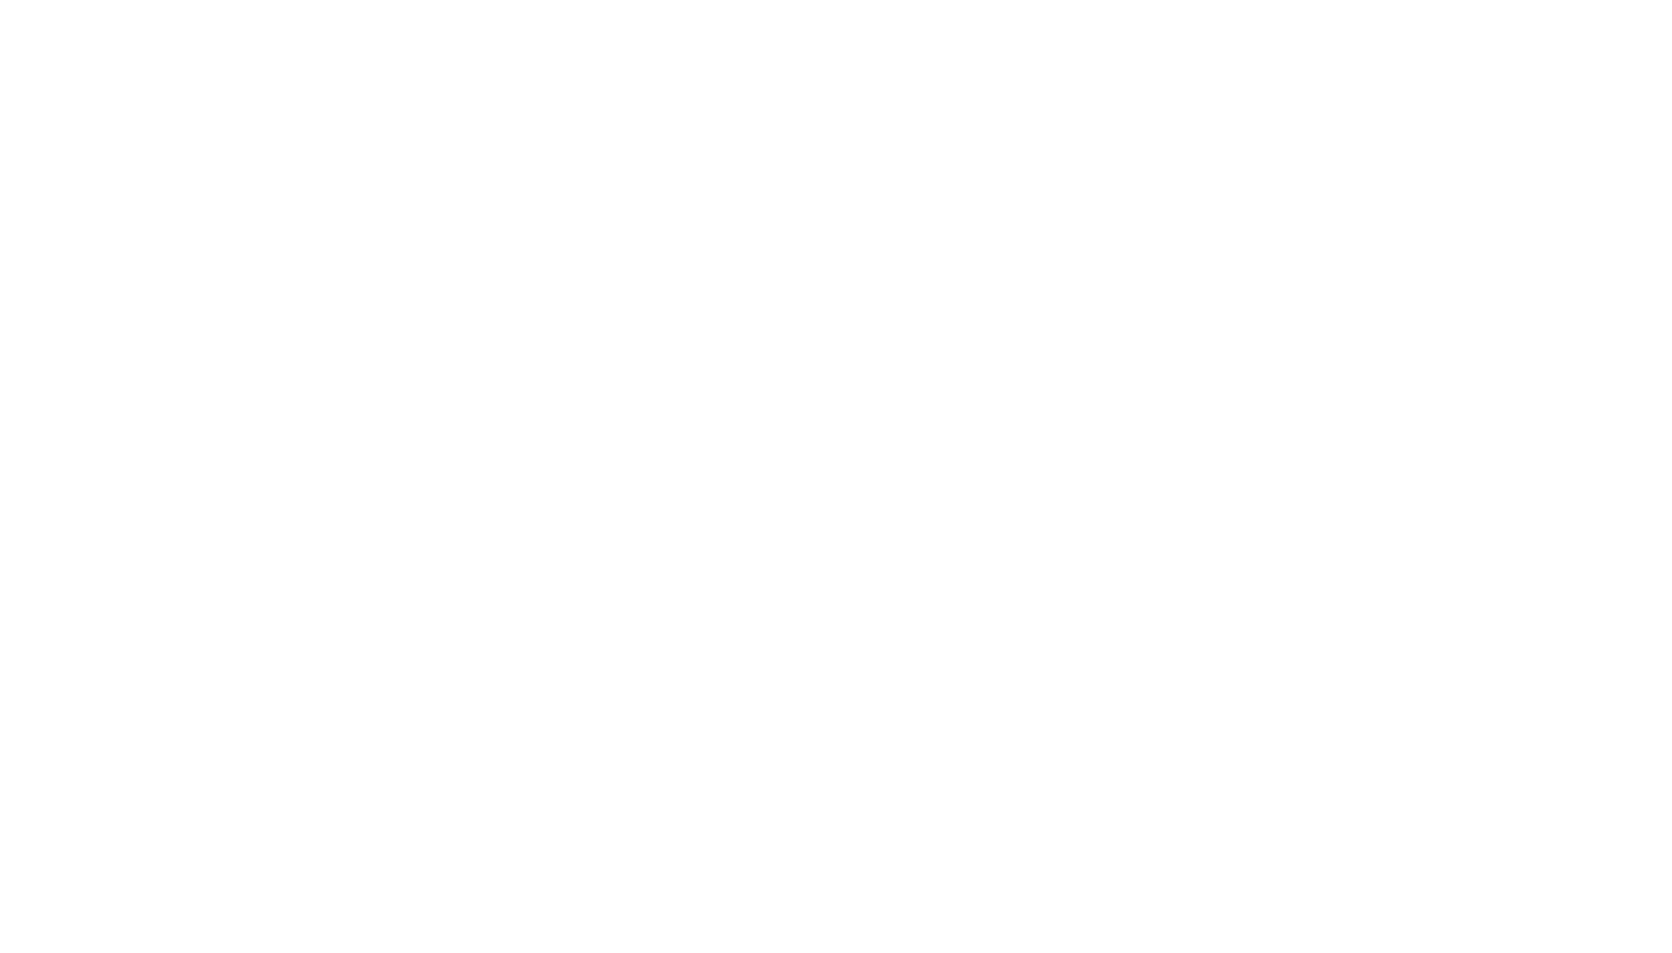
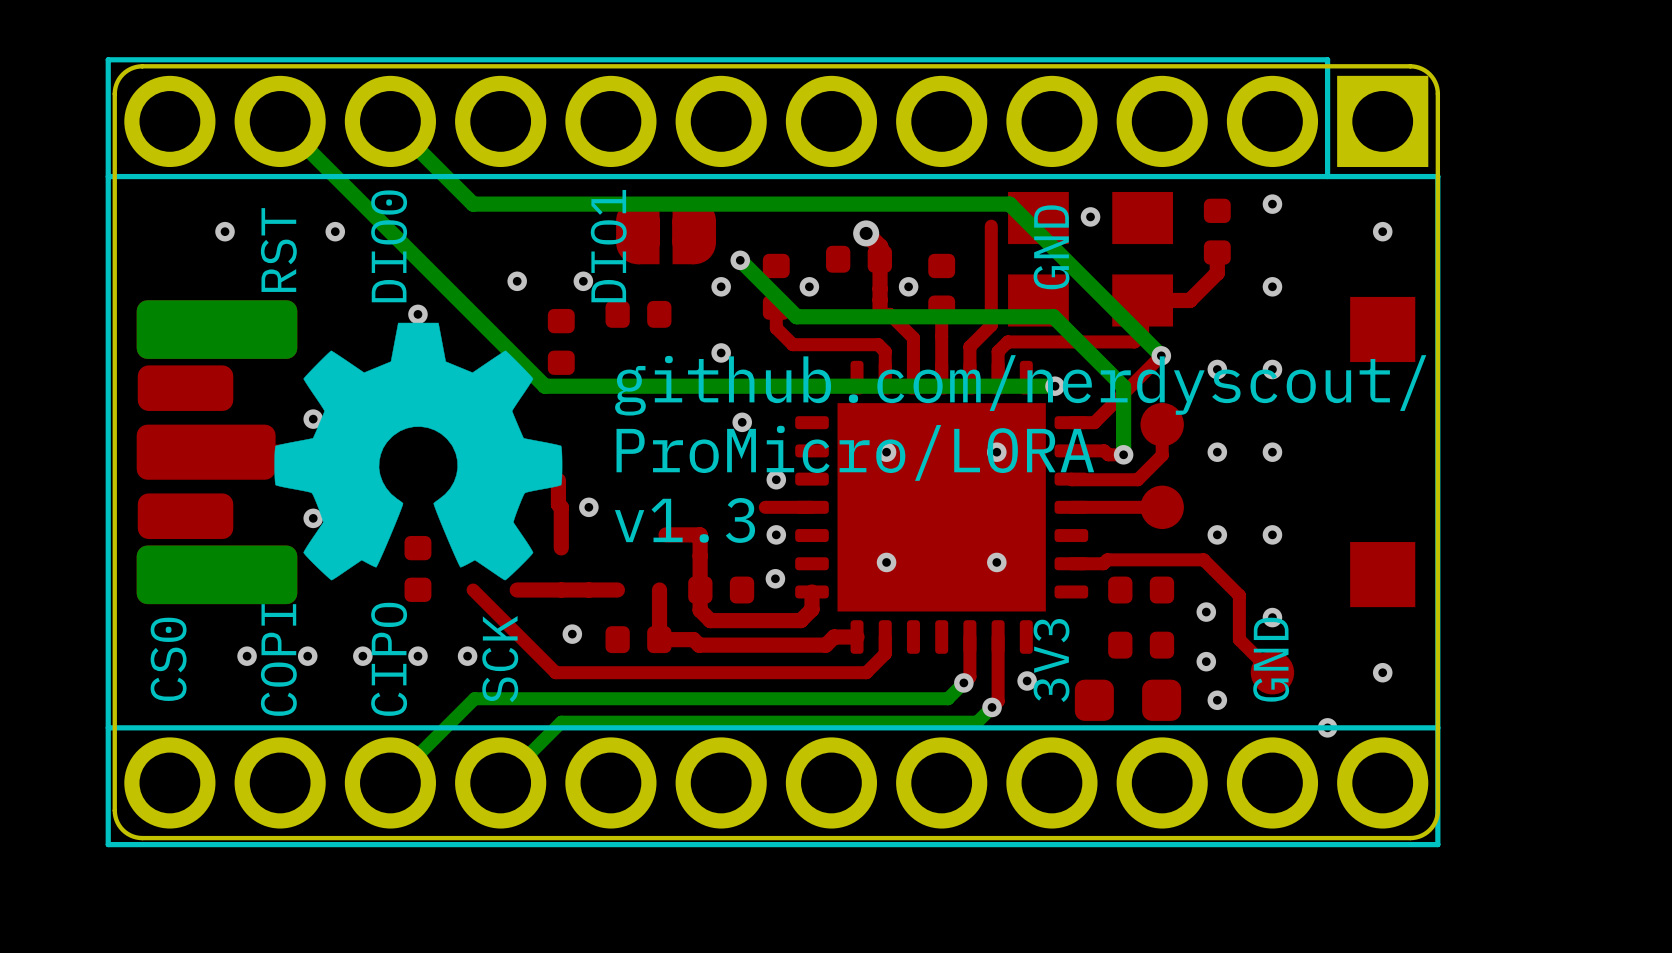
board edge: none -> (1410, 66) (142, 66) (127, 70) (118, 79) (114, 93) (114, 810) (118, 825) (130, 835) (142, 838) (1410, 838) (1424, 833) (1433, 825) (1437, 810) (1437, 93) (1436, 84) (1429, 74) (1419, 67) (1410, 66)
bottom track: none -> (280, 121) (544, 386) (1055, 386)
bottom track: none -> (390, 121) (473, 204) (1009, 204) (1161, 355)
via: none -> (1272, 204)
via: none -> (1090, 216)
top track: none -> (991, 226) (991, 325) (969, 346) (969, 377)
via: none -> (225, 231)
via: none -> (335, 231)
part: none -> (666, 231)
part: none -> (1217, 231)
via: none -> (1382, 231)
top track: none -> (866, 233) (879, 247) (880, 314) (889, 314) (913, 338) (913, 377)
via: none -> (866, 233)
text: none -> DIO0 (389, 246)
text: none -> DIO1 (608, 246)
text: none -> GND (1051, 247)
text: none -> RST (278, 250)
top track: none -> (1217, 252) (1217, 273) (1189, 300) (1142, 300) (1142, 333) (1134, 341) (1007, 341) (998, 351) (998, 377)
part: none -> (858, 259)
part: none -> (1090, 259)
bottom track: none -> (740, 260) (796, 316) (1053, 316) (1123, 386) (1123, 454)
via: none -> (740, 260)
via: none -> (517, 281)
via: none -> (583, 281)
via: none -> (721, 286)
part: none -> (776, 286)
via: none -> (809, 286)
via: none -> (908, 286)
part: none -> (941, 286)
via: none -> (1272, 286)
top track: none -> (776, 307) (776, 328) (792, 344) (878, 344) (885, 351) (885, 377)
top track: none -> (941, 307) (941, 377)
via: none -> (417, 314)
part: none -> (638, 314)
drawing: none -> [274, 322, 563, 581]
part: none -> (1382, 329)
part: none -> (561, 341)
via: none -> (721, 352)
top track: none -> (1161, 355) (1094, 422) (1071, 422)
via: none -> (1161, 355)
via: none -> (1217, 369)
via: none -> (1272, 369)
text: none -> github.com/nerdyscout/ (1020, 385)
via: none -> (1055, 386)
via: none -> (313, 419)
via: none -> (742, 422)
top track: none -> (1162, 424) (1162, 455) (1137, 479) (1071, 479)
part: none -> (1162, 424)
top track: none -> (1071, 450) (1104, 450) (1108, 454) (1123, 454)
part: none -> (206, 452)
part: none -> (216, 452)
part: none -> (773, 452)
via: none -> (886, 452)
via: none -> (996, 452)
via: none -> (1217, 452)
via: none -> (1272, 452)
text: none -> ProMicro/LORA (855, 452)
via: none -> (1123, 454)
via: none -> (776, 479)
top track: none -> (558, 480) (558, 504) (561, 507) (561, 547)
via: none -> (588, 507)
top track: none -> (812, 507) (765, 507)
part: none -> (941, 507)
top track: none -> (1162, 507) (1071, 507)
part: none -> (1162, 507)
via: none -> (313, 518)
text: none -> v1.3 (684, 520)
top track: none -> (666, 534) (700, 534) (700, 610) (710, 620) (800, 620) (812, 609) (812, 591)
via: none -> (776, 534)
via: none -> (1217, 534)
via: none -> (1272, 534)
via: none -> (886, 562)
via: none -> (996, 562)
top track: none -> (1071, 563) (1103, 563) (1107, 559) (1203, 559) (1239, 595) (1239, 639) (1272, 672)
part: none -> (417, 568)
part: none -> (1382, 574)
via: none -> (775, 578)
top track: none -> (473, 590) (555, 672) (866, 672) (885, 653) (885, 637)
top track: none -> (617, 590) (517, 590)
top track: none -> (659, 590) (659, 639) (693, 639) (699, 645) (825, 645) (834, 637) (857, 637)
part: none -> (721, 590)
part: none -> (1141, 590)
via: none -> (1206, 612)
via: none -> (1272, 617)
via: none -> (572, 634)
top track: none -> (969, 637) (969, 676) (963, 682)
top track: none -> (998, 637) (998, 701) (992, 707)
part: none -> (638, 639)
part: none -> (1141, 645)
via: none -> (247, 656)
via: none -> (307, 656)
via: none -> (362, 656)
via: none -> (417, 656)
via: none -> (467, 656)
text: none -> CS0 (168, 659)
text: none -> CIPO (389, 659)
text: none -> SCK (500, 659)
text: none -> GND (1271, 659)
text: none -> COPI (278, 660)
text: none -> 3V3 (1051, 660)
via: none -> (1206, 661)
part: none -> (1272, 672)
via: none -> (1382, 672)
via: none -> (1027, 680)
bottom track: none -> (963, 682) (948, 698) (474, 698) (390, 782)
via: none -> (963, 682)
part: none -> (1128, 700)
via: none -> (1217, 700)
bottom track: none -> (992, 707) (977, 722) (561, 722) (500, 782)
via: none -> (992, 707)
via: none -> (1327, 727)

